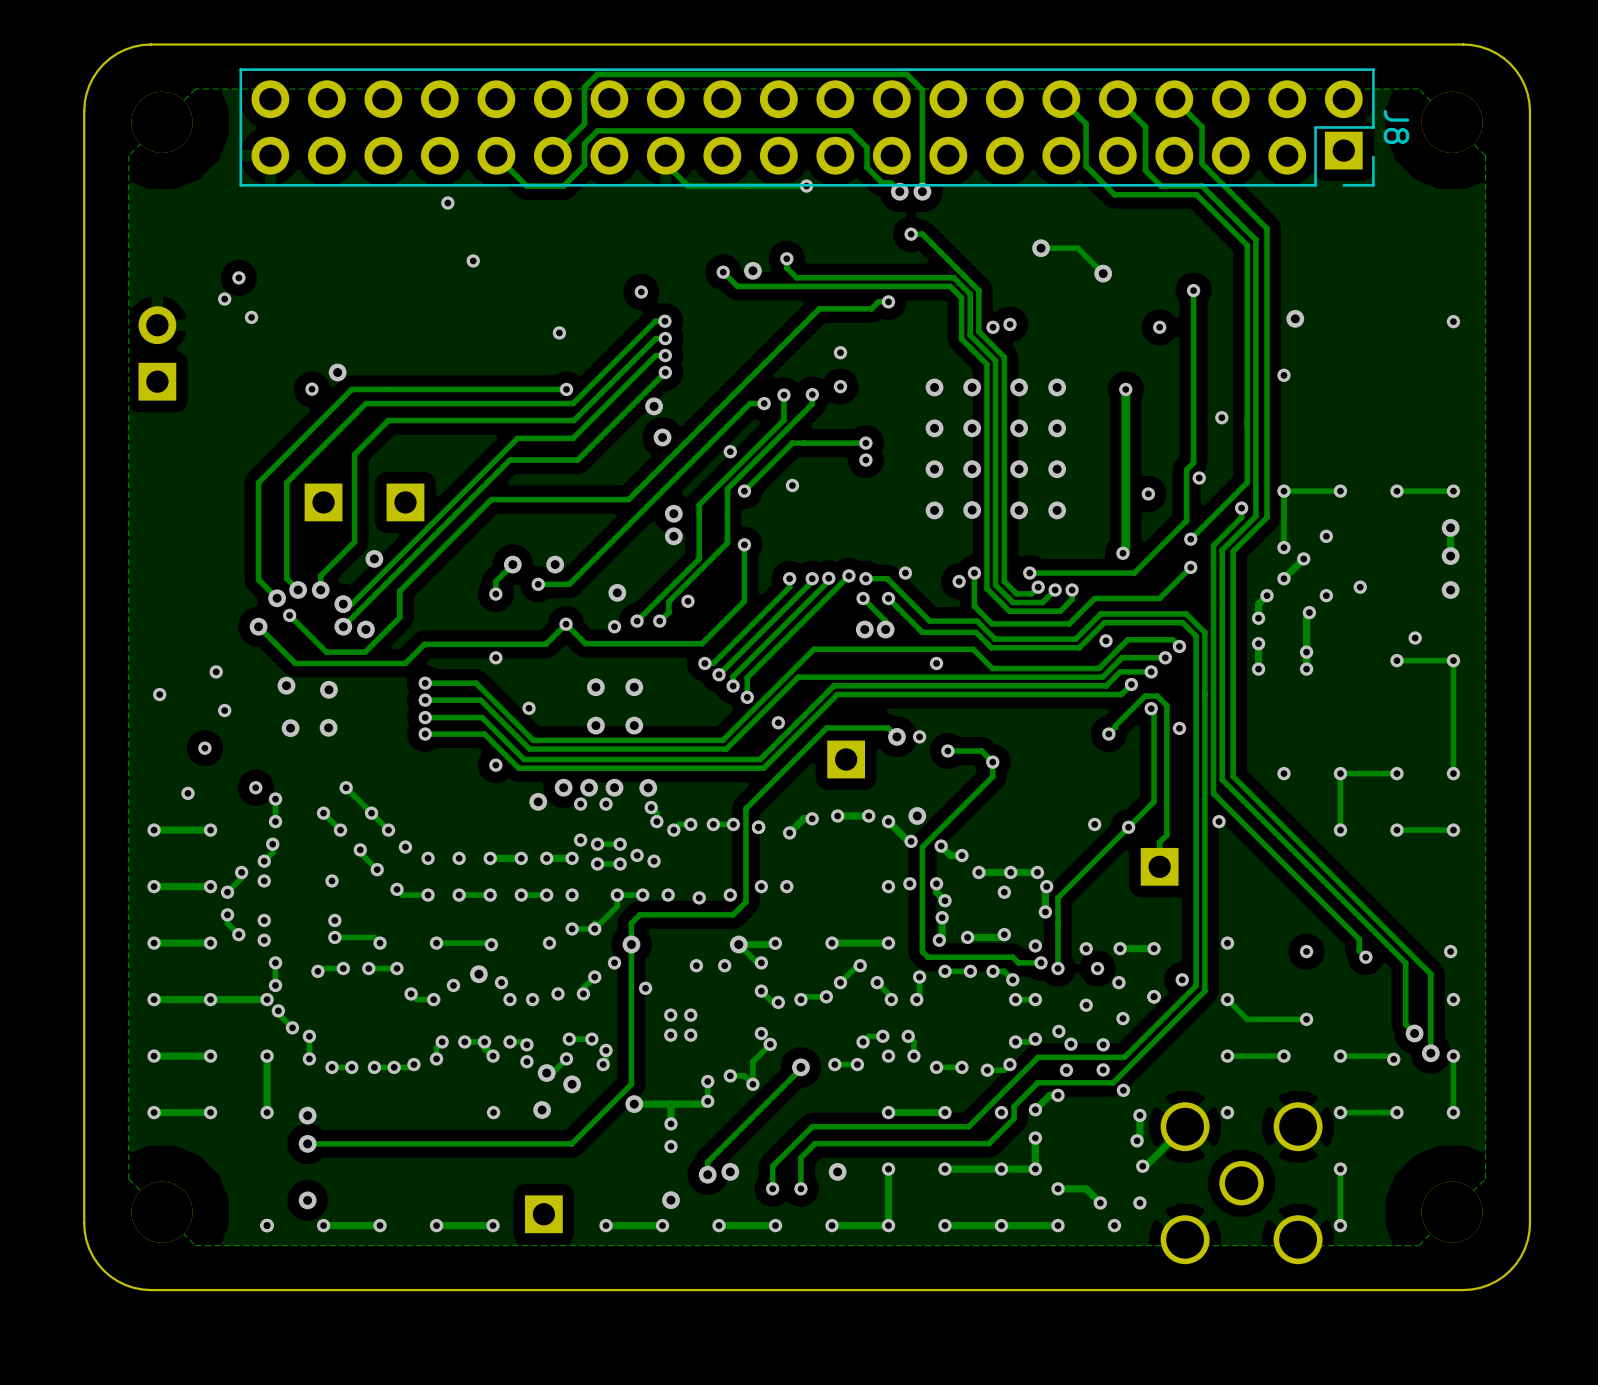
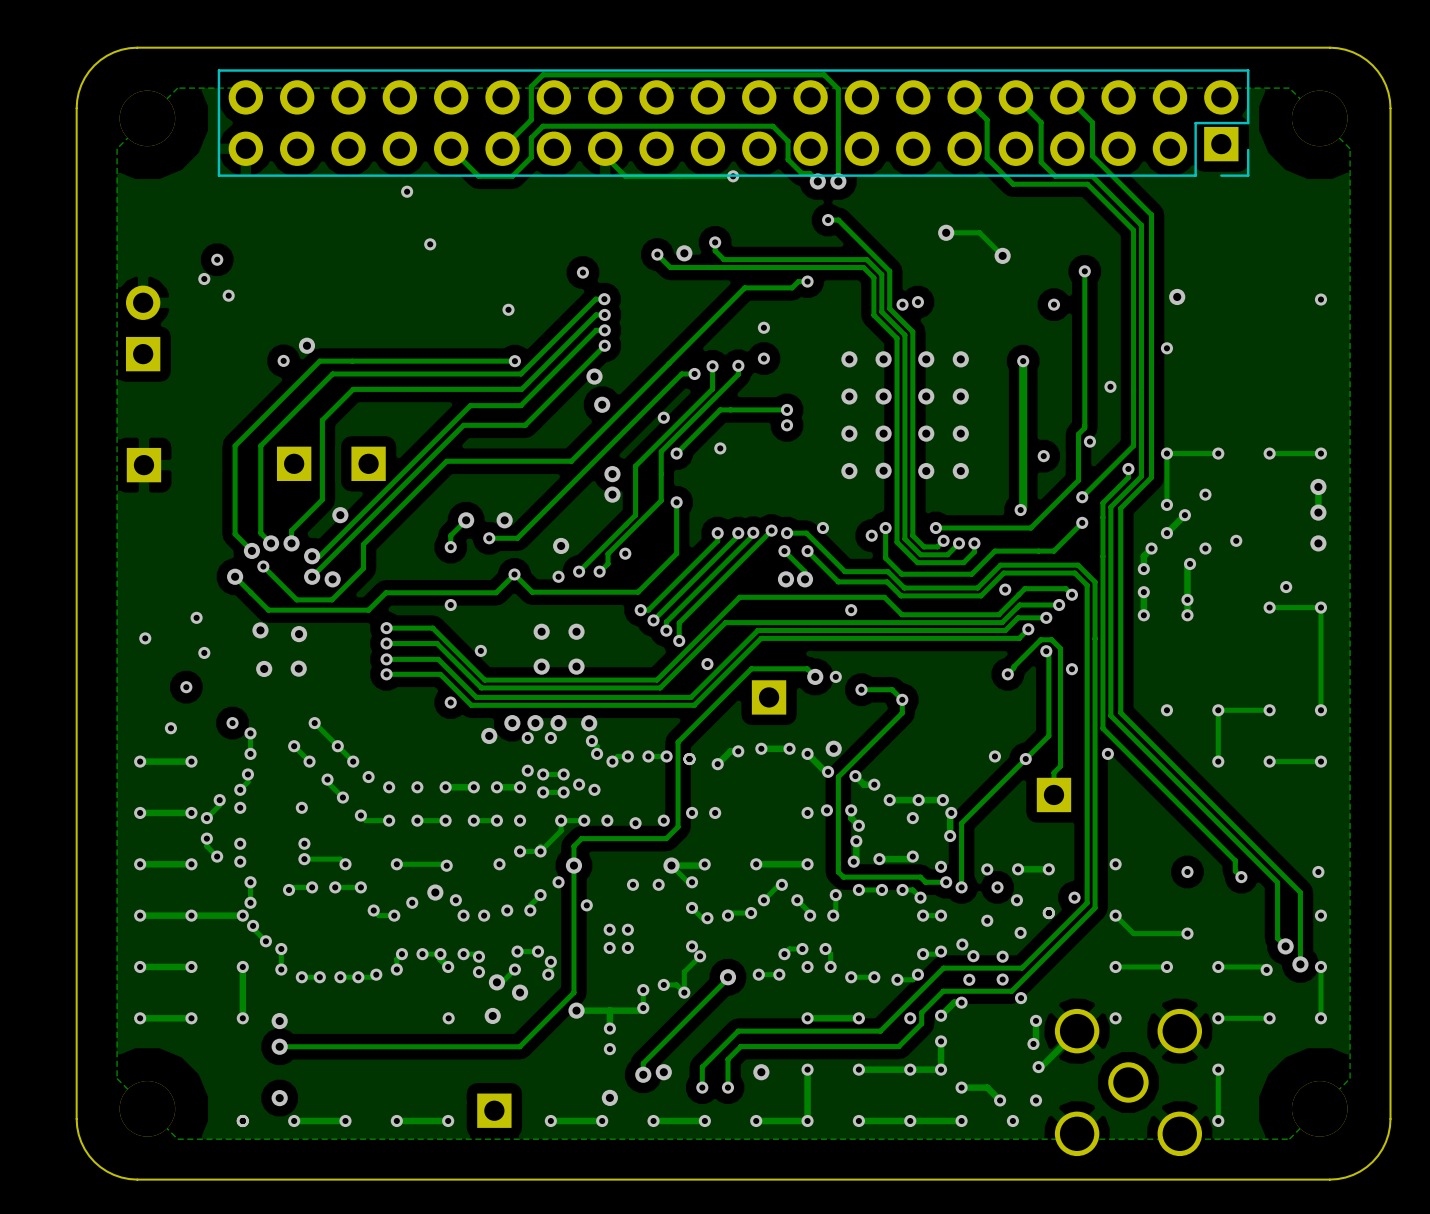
J8 name: J8 (1396, 126) -> none
part: none -> (143, 465)

